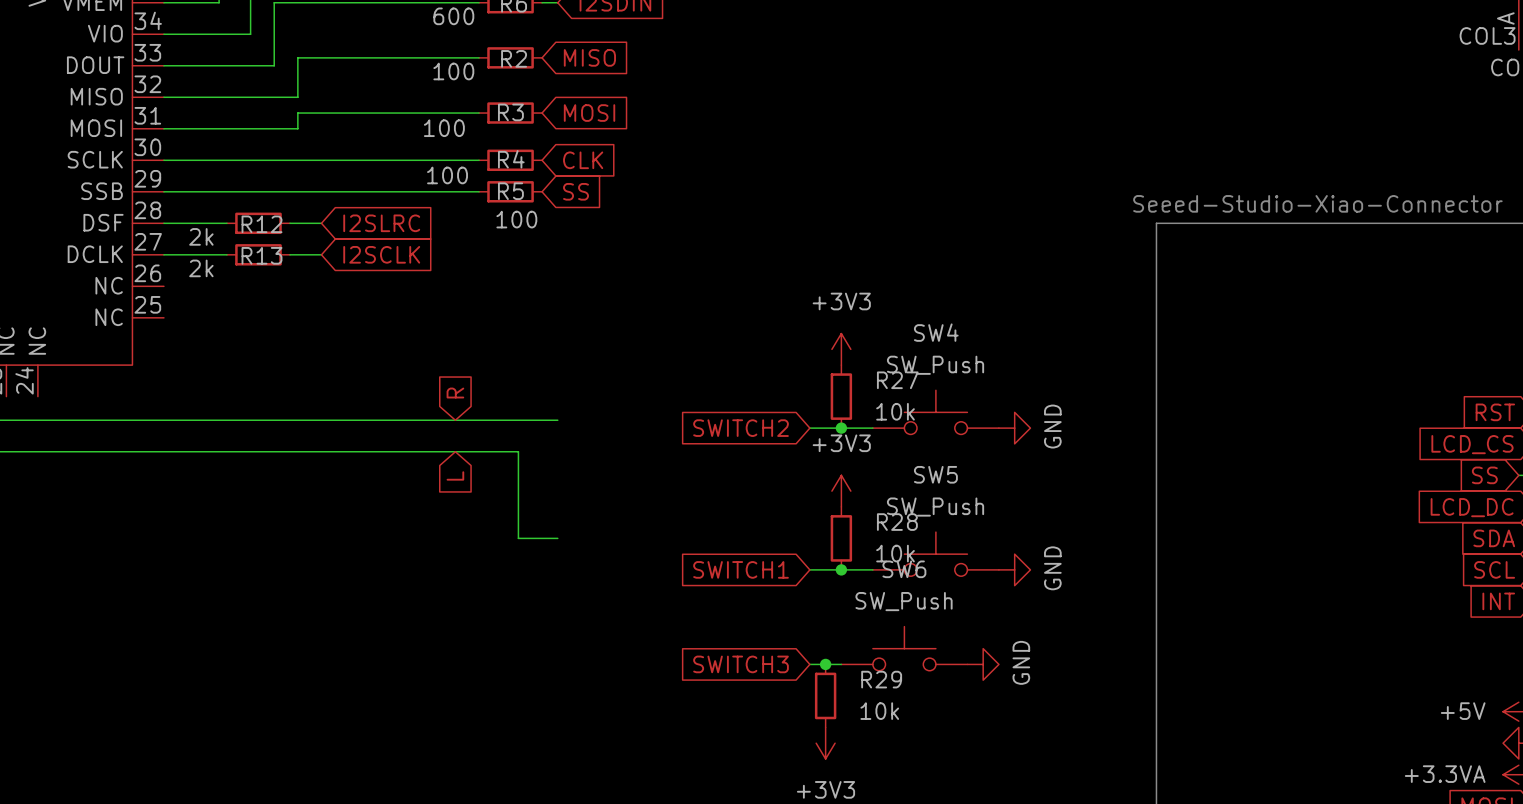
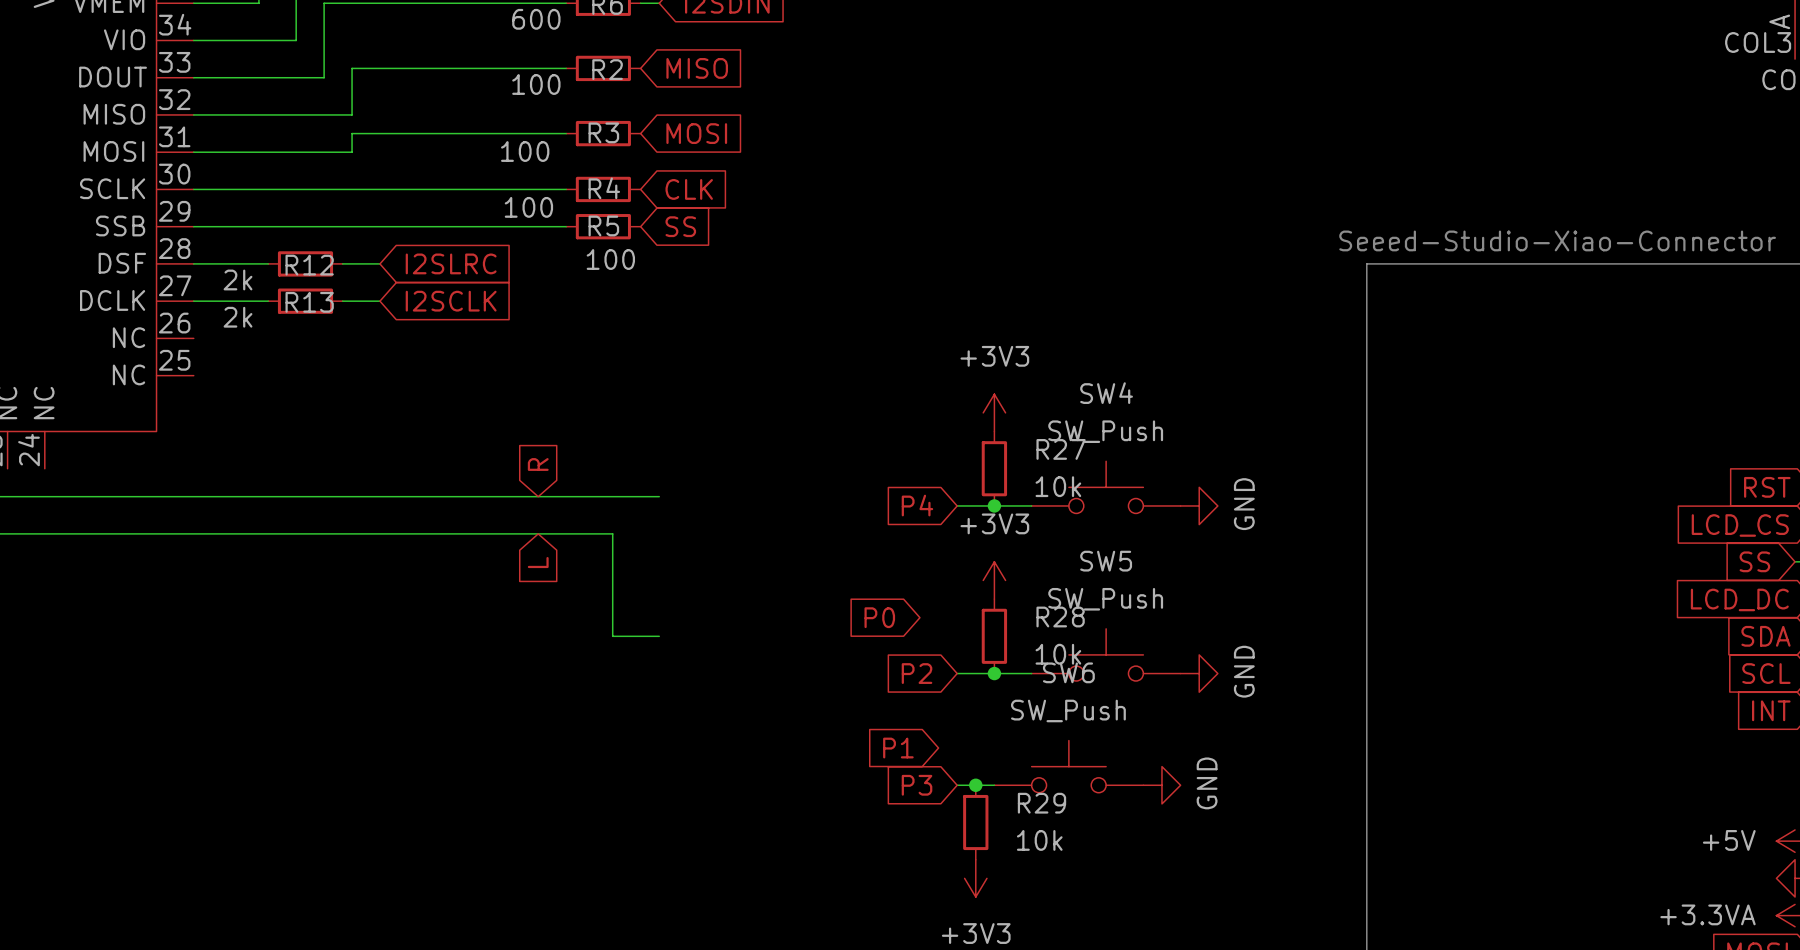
global label: SWITCH2 (741, 428) -> P4 (917, 505)
global label: none -> P0 (879, 617)
global label: SWITCH1 (741, 569) -> P2 (917, 673)
global label: none -> P1 (898, 748)
global label: SWITCH3 (741, 664) -> P3 (917, 785)

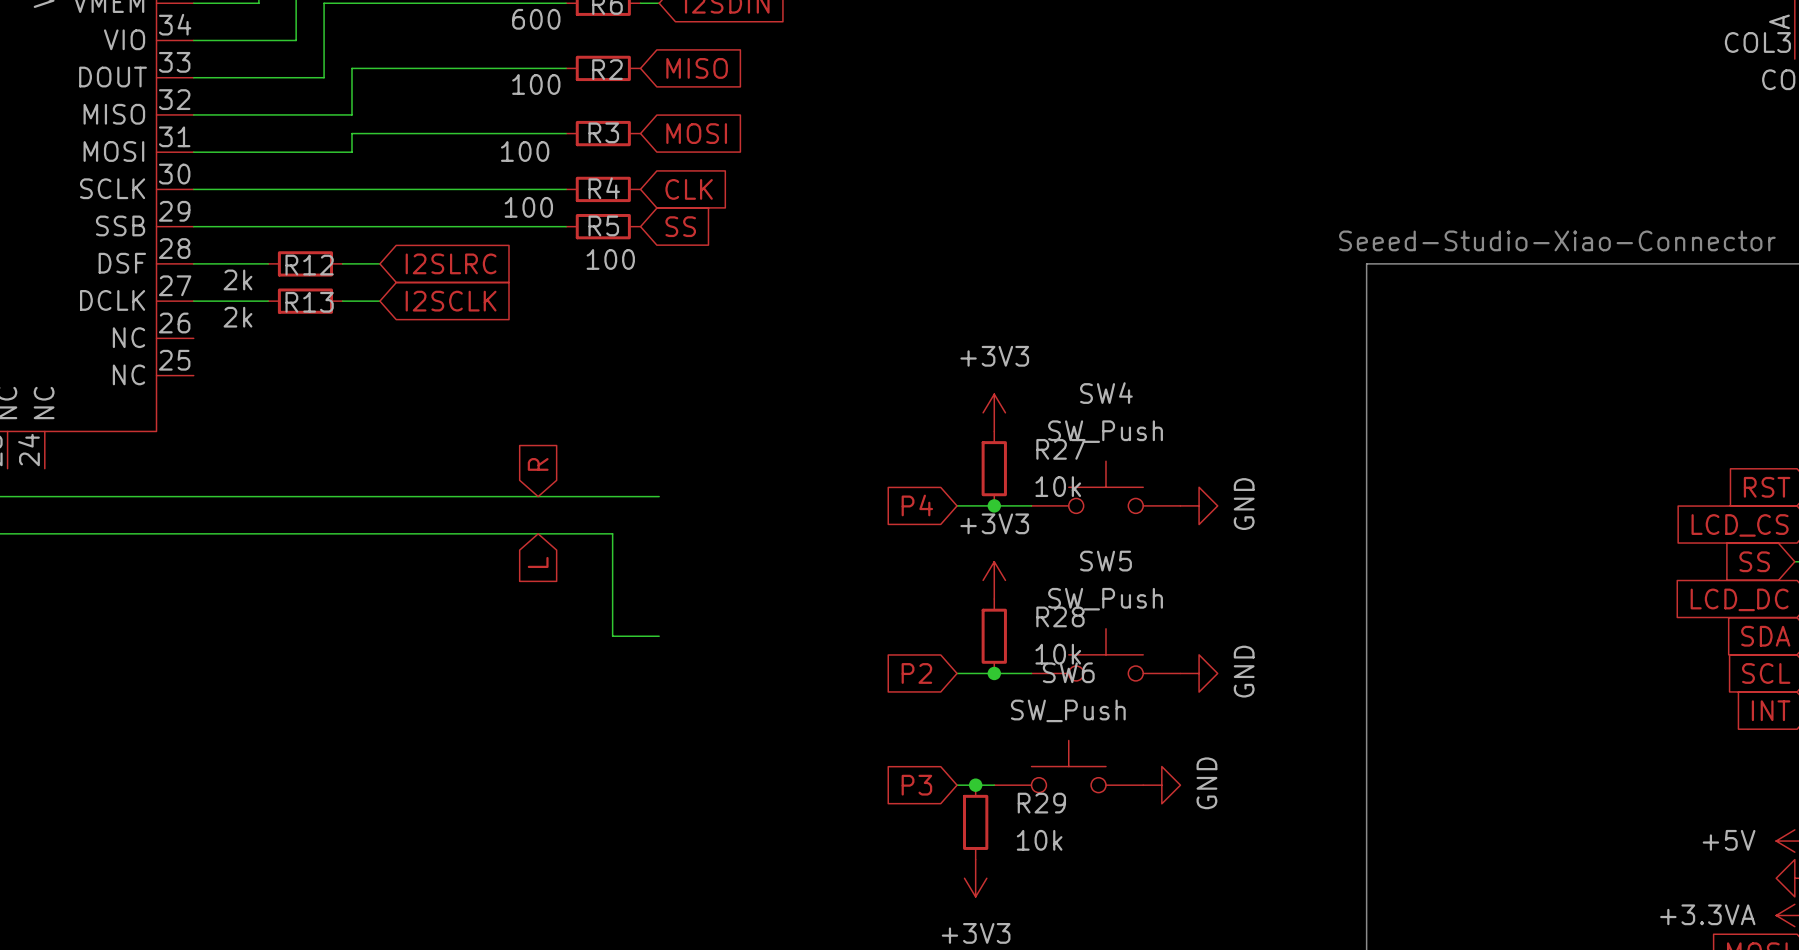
global label: P0 (879, 617) -> none
global label: P1 (898, 748) -> none

